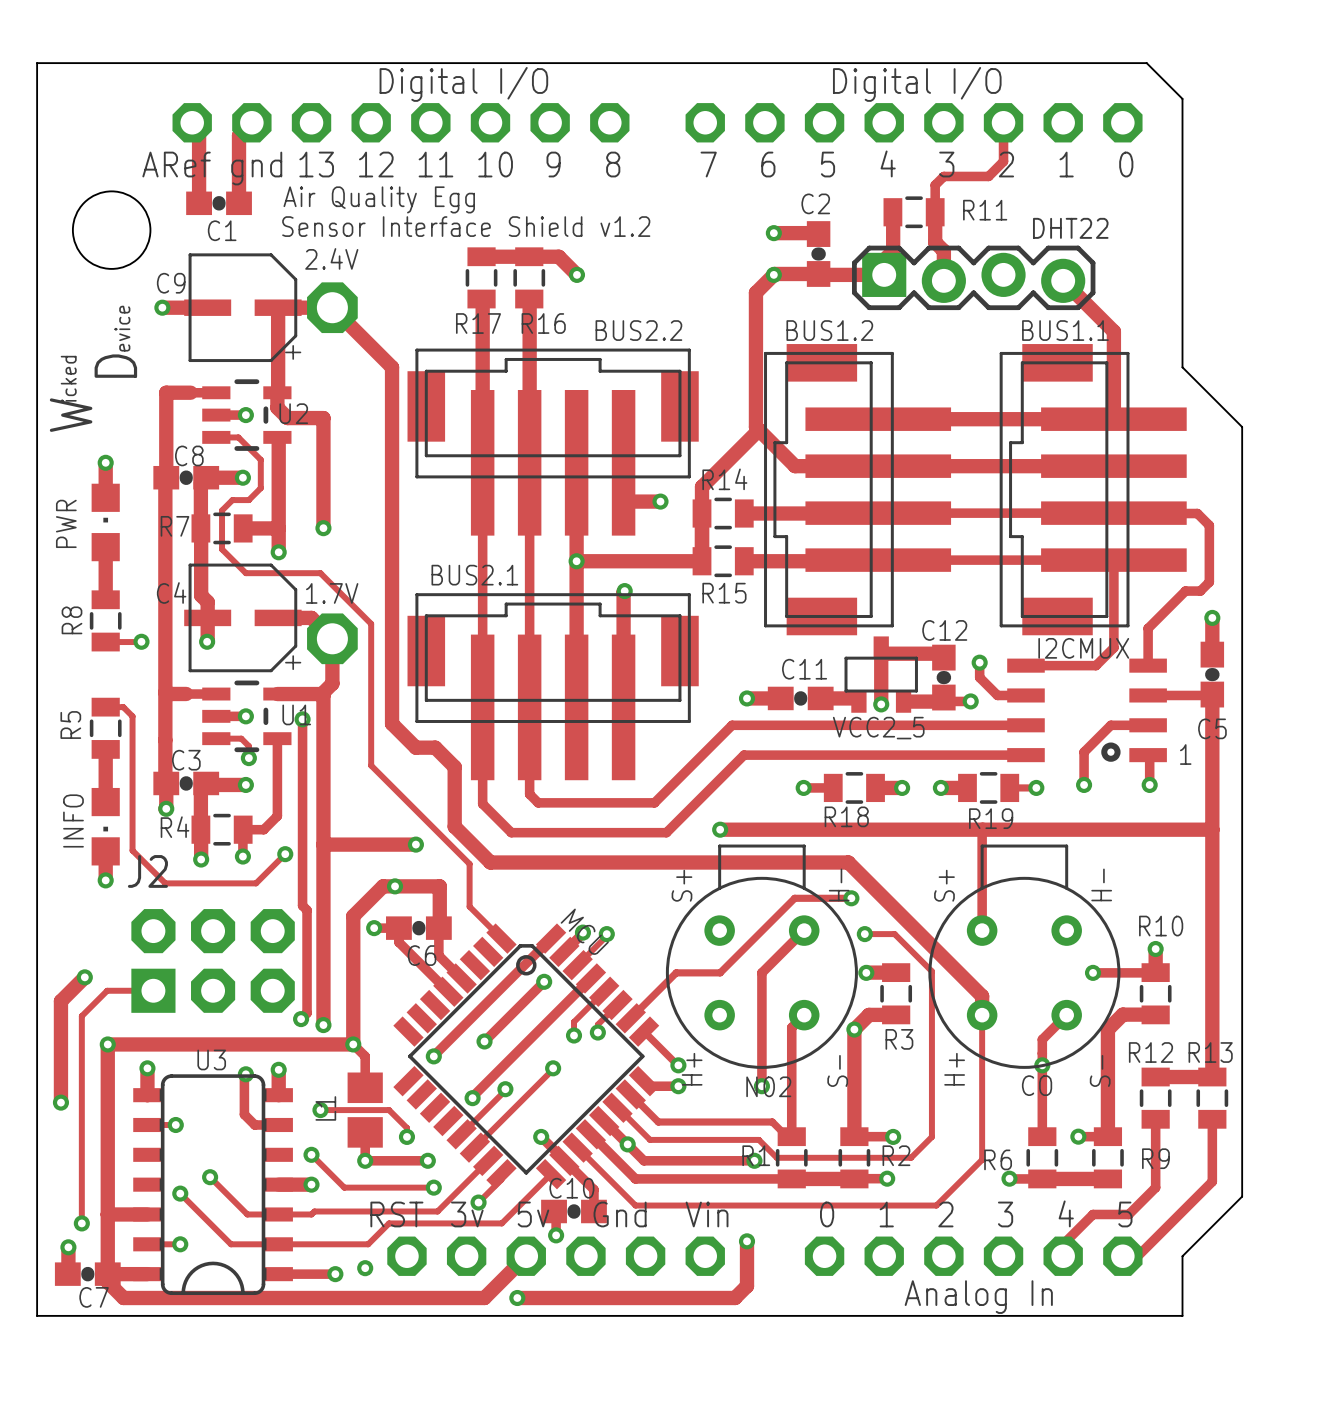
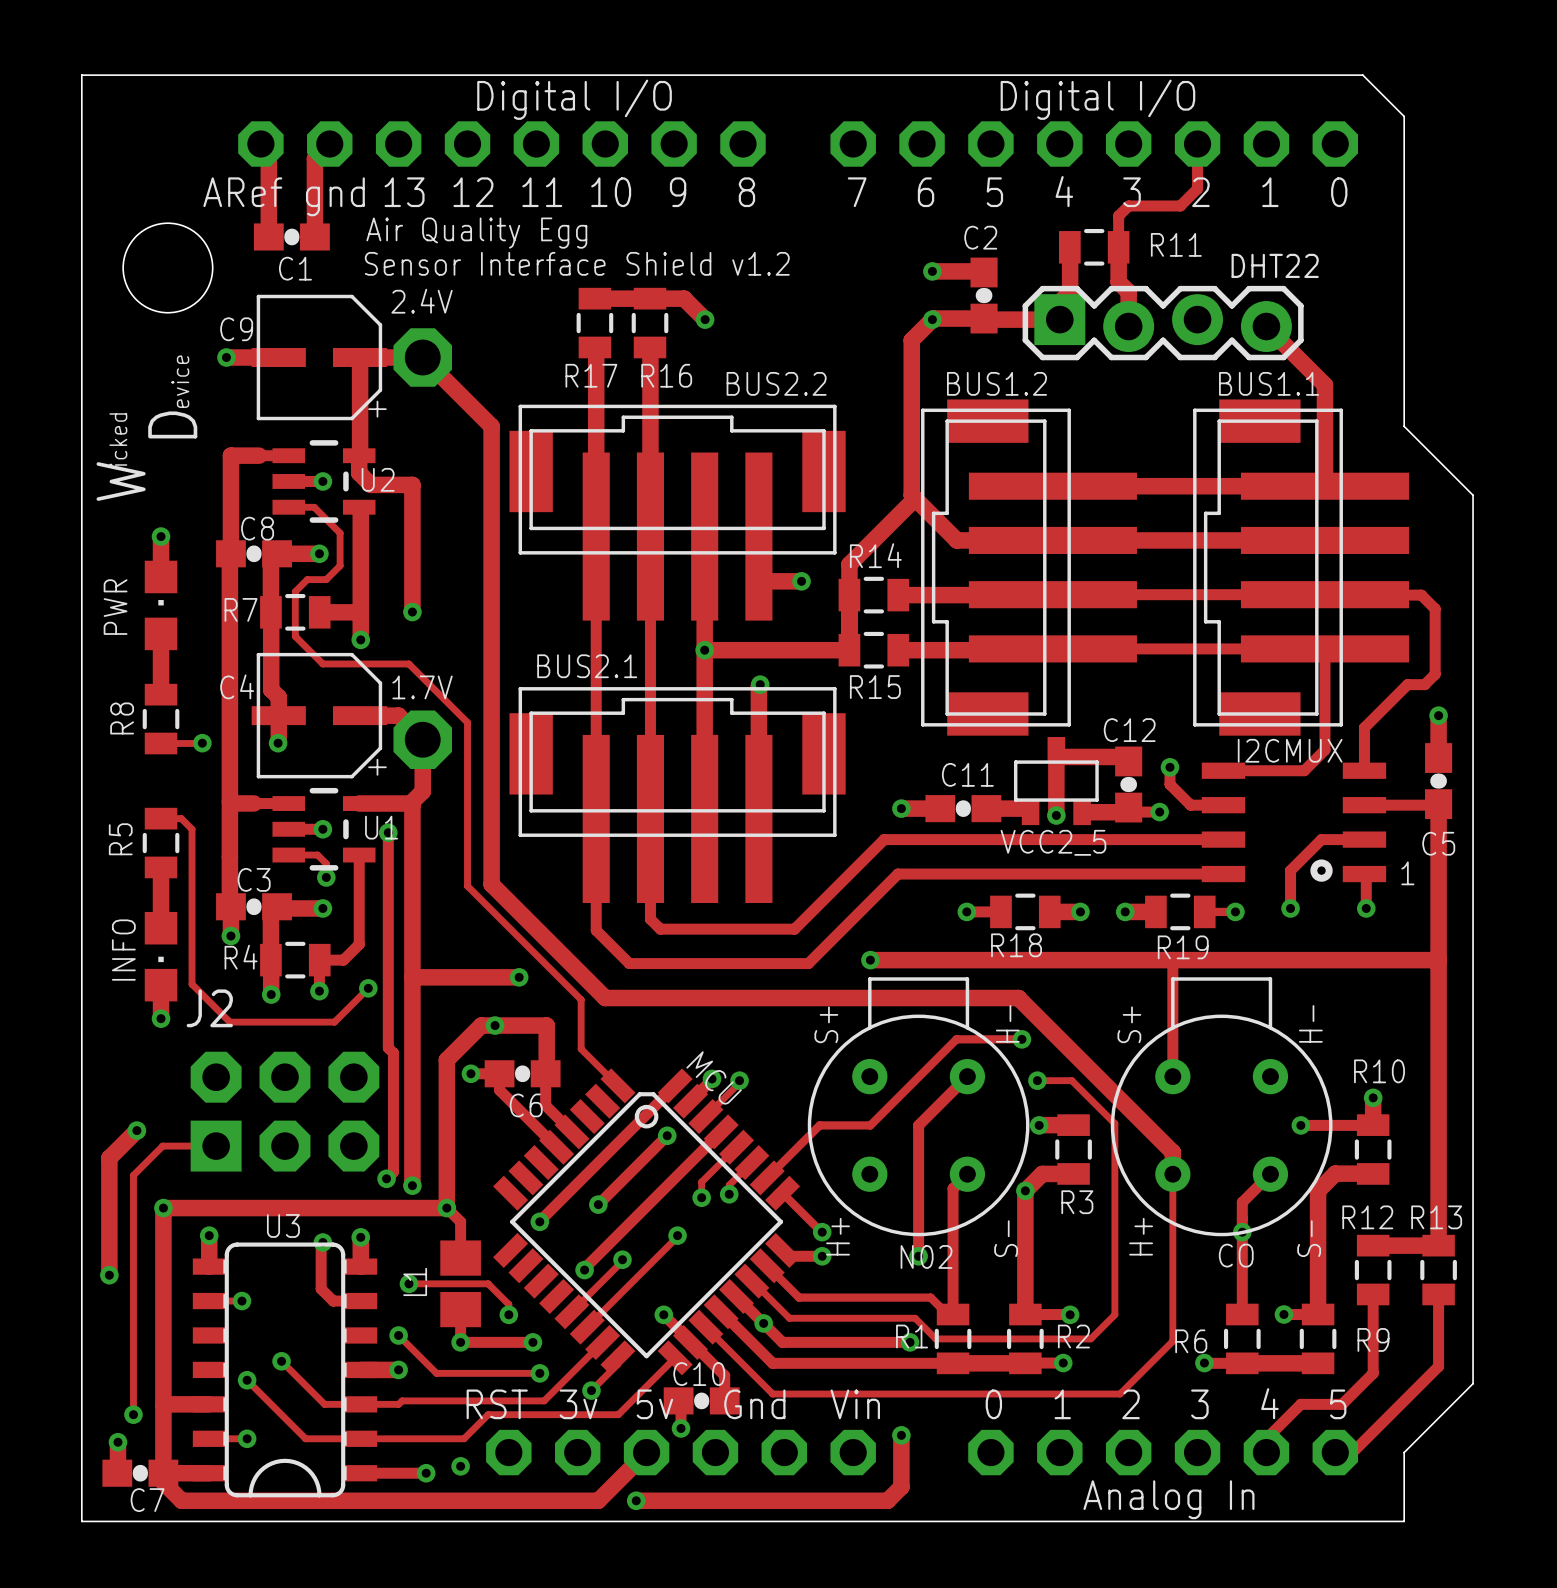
track: (392, 723) (415, 747) (435, 747) (454, 767) (454, 826) -> (491, 837) (491, 884) (563, 956)

